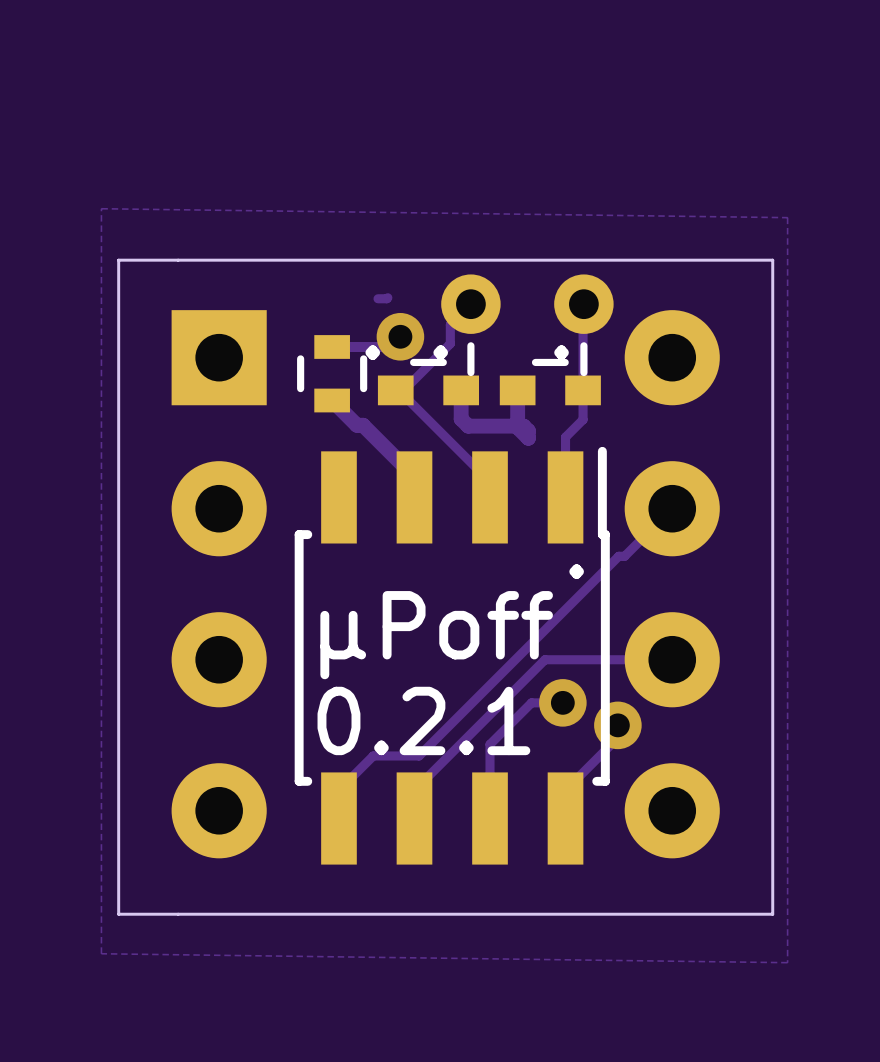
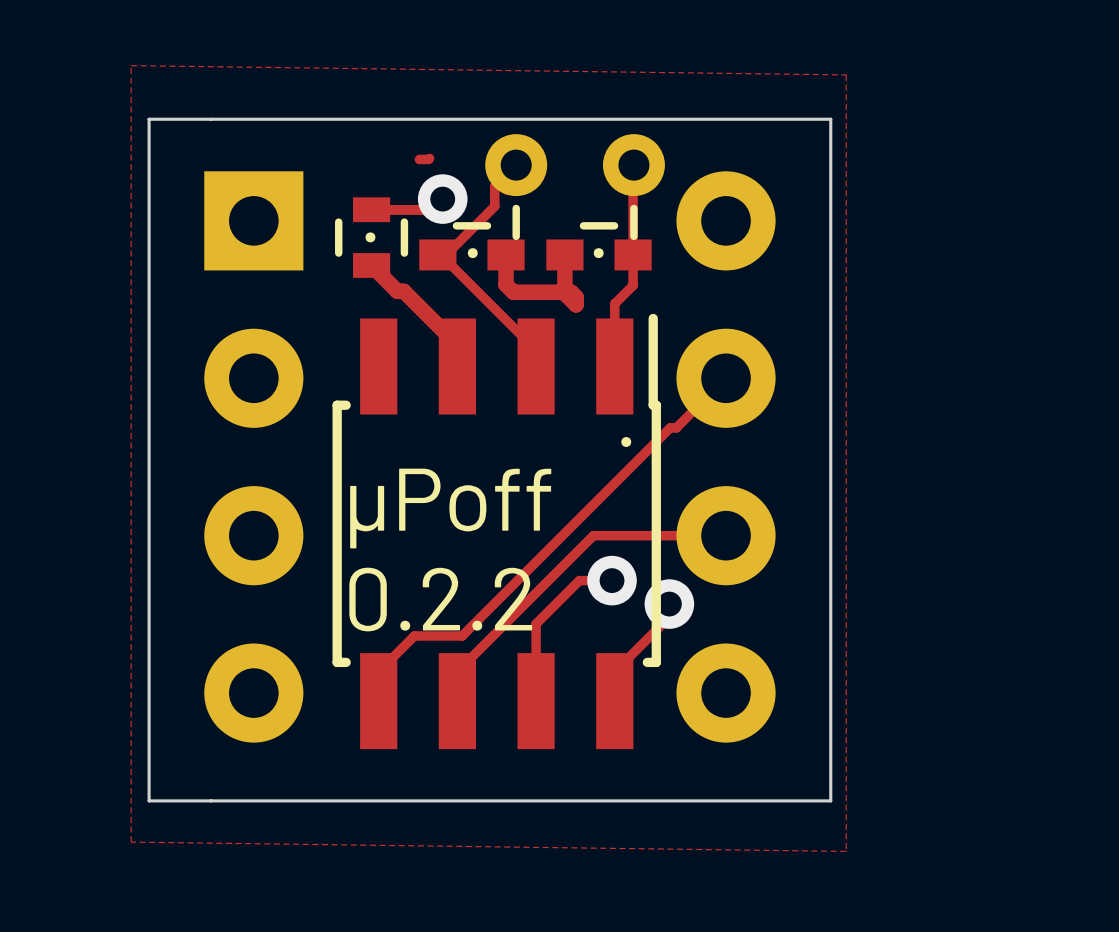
text: . (372, 352) -> none
text: . (440, 352) -> none
text position: . (561, 352) -> . (598, 253)
text: none -> . (370, 237)
text: none -> . (472, 253)
text: 0.2.1 (423, 720) -> 0.2.2 (440, 599)

